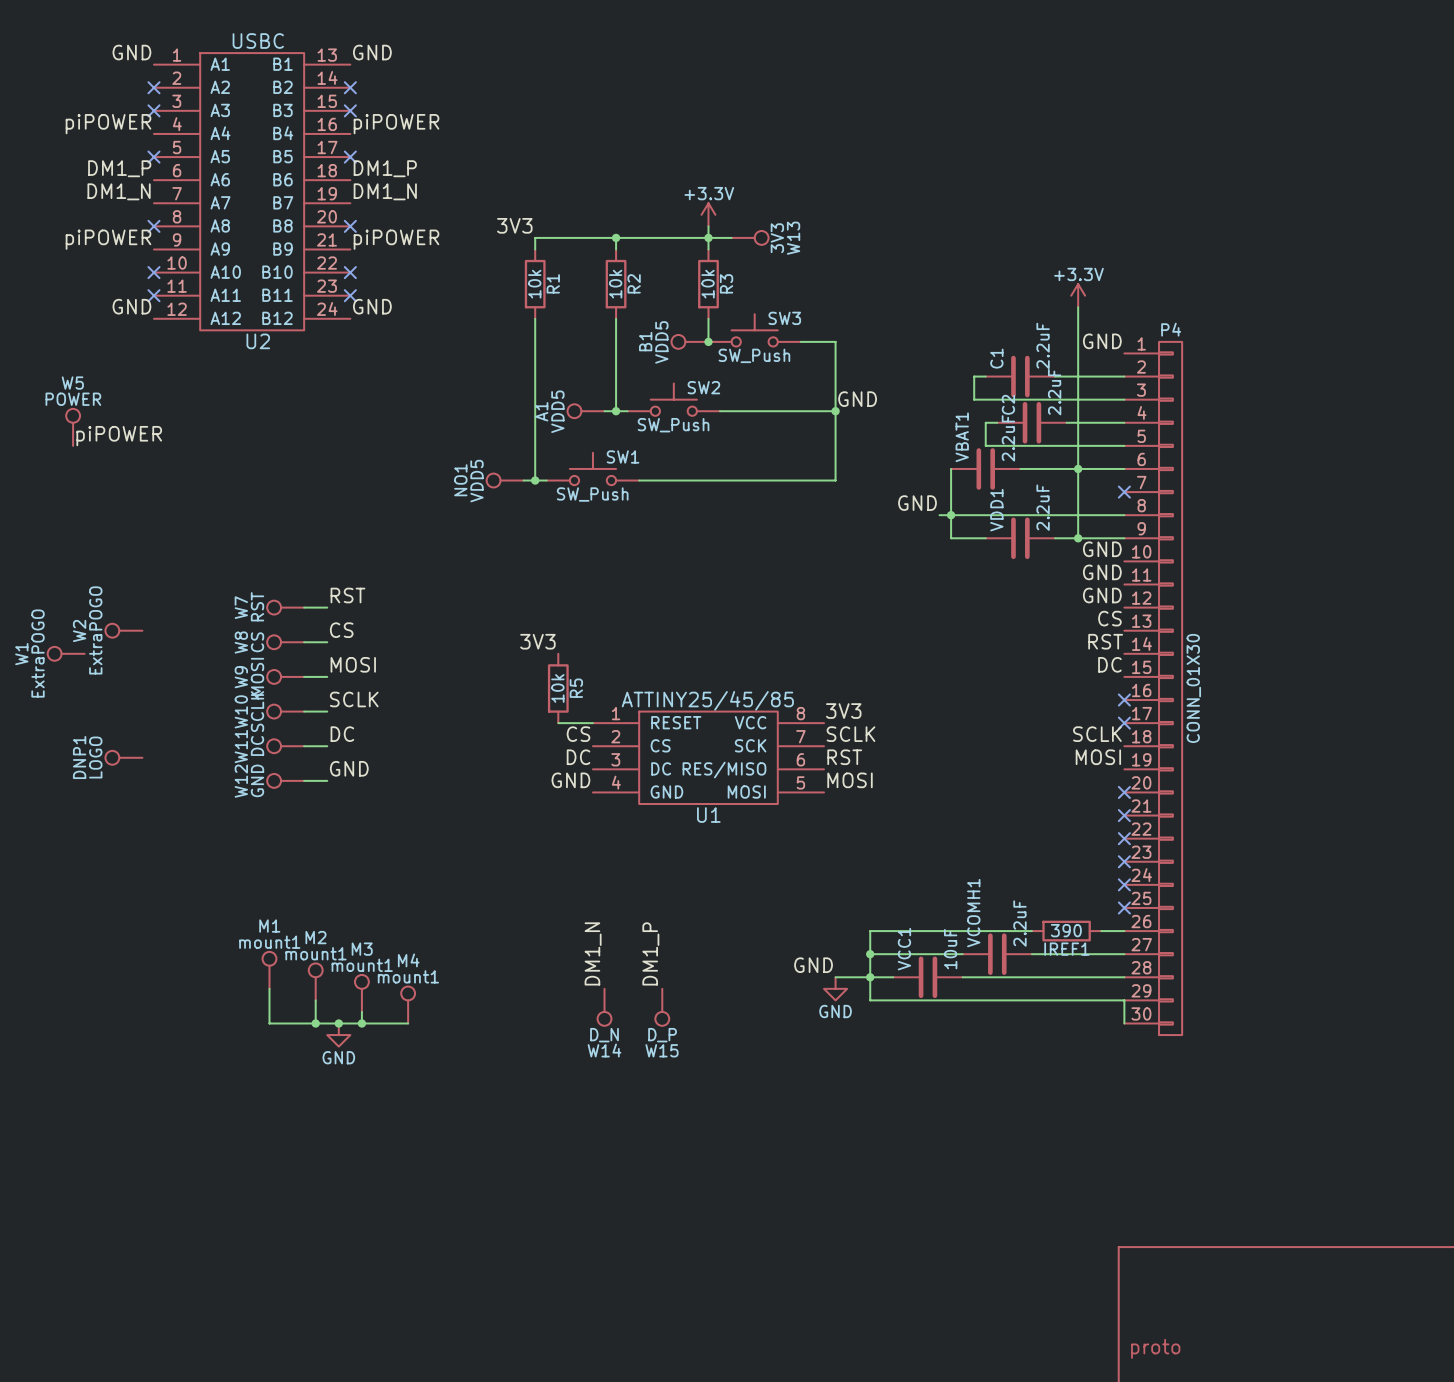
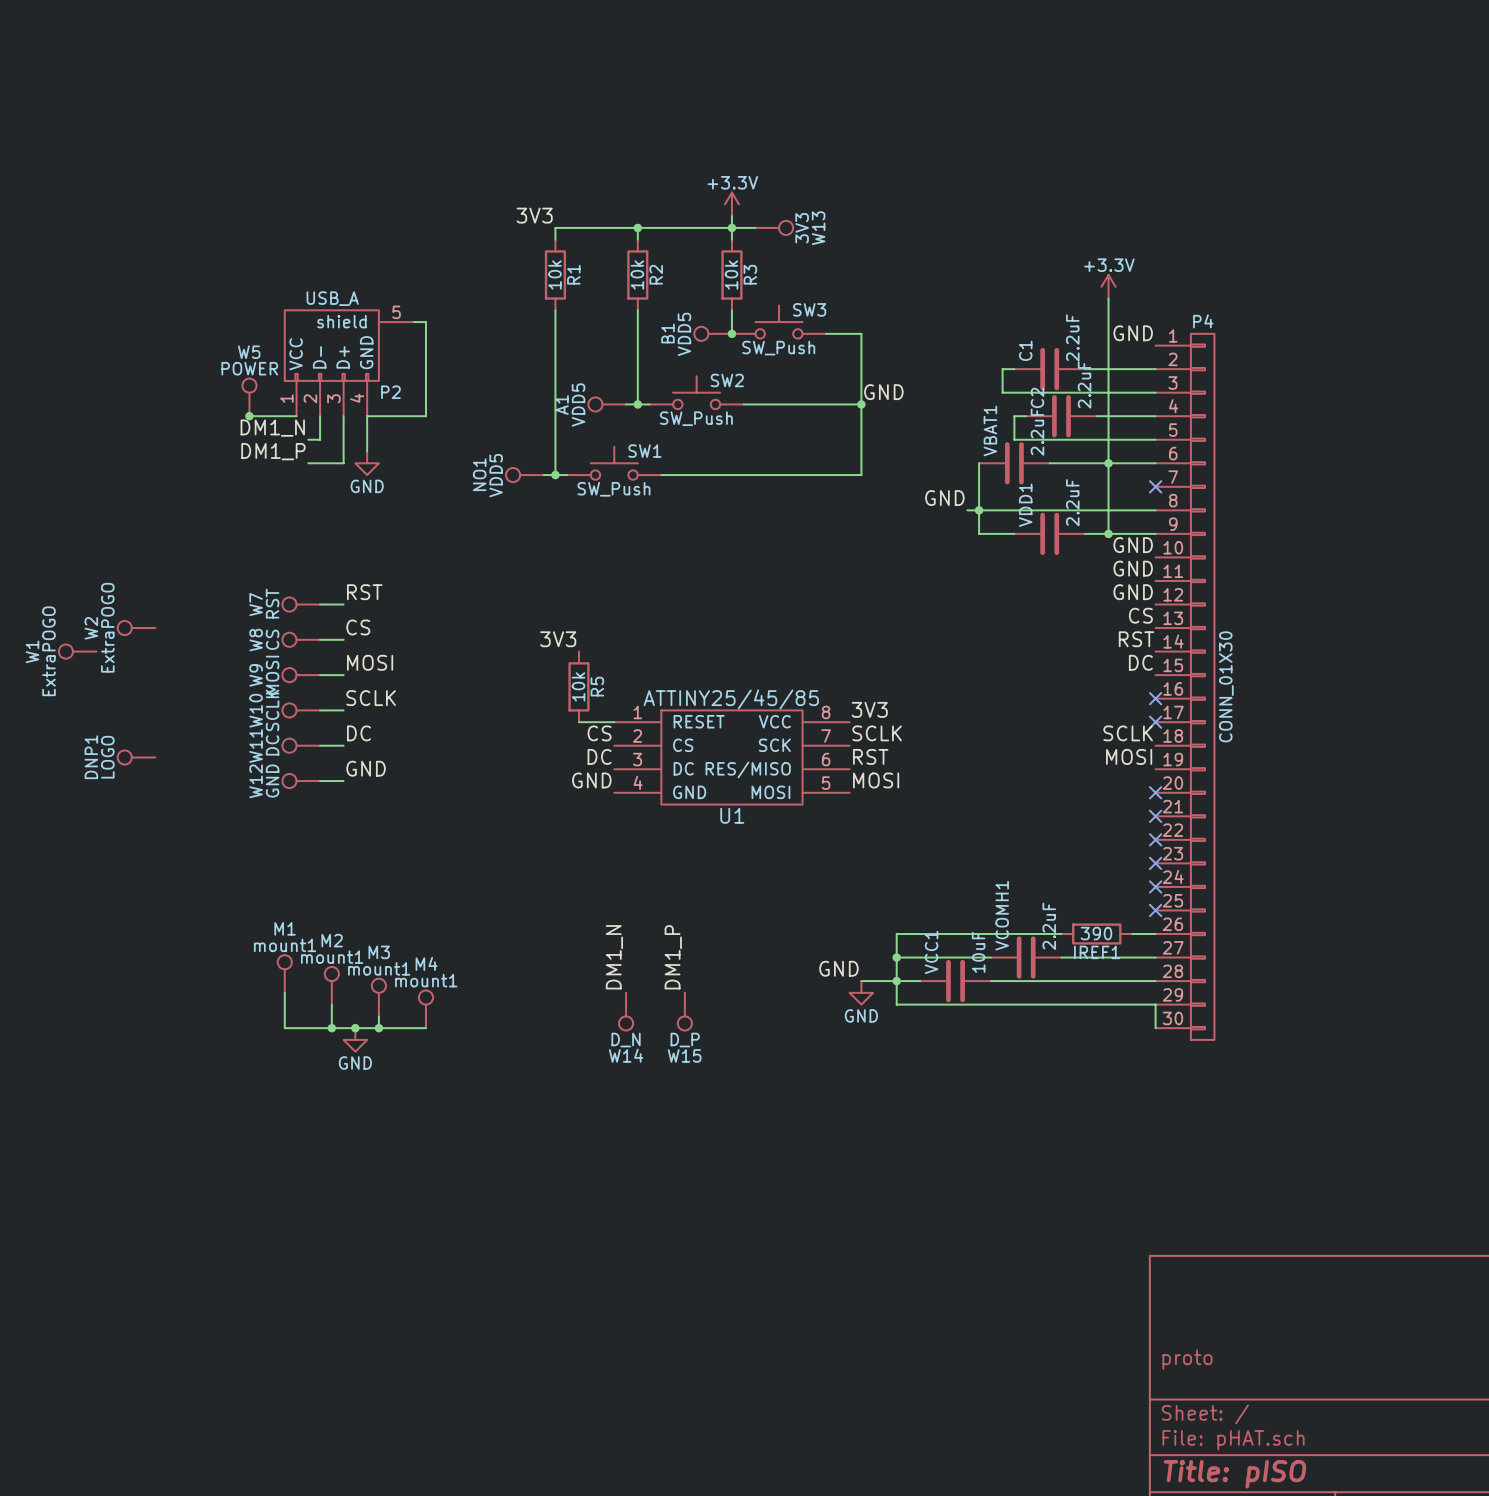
label: GND (131, 52) -> none
label: GND (372, 52) -> none
no-connect mark: (153, 87) -> none
no-connect mark: (350, 87) -> none
no-connect mark: (153, 110) -> none
no-connect mark: (350, 110) -> none
label: piPOWER (108, 124) -> none
label: piPOWER (396, 124) -> none
no-connect mark: (153, 157) -> none
no-connect mark: (350, 157) -> none
label: DM1_P (119, 168) -> none
label: DM1_P (385, 168) -> none
label: DM1_N (119, 191) -> none
U2: USBC (252, 191) -> none
label: DM1_N (385, 191) -> none
no-connect mark: (153, 226) -> none
no-connect mark: (350, 226) -> none
label: piPOWER (108, 239) -> none
label: piPOWER (396, 239) -> none
no-connect mark: (153, 272) -> none
no-connect mark: (350, 272) -> none
no-connect mark: (153, 295) -> none
no-connect mark: (350, 295) -> none
label: GND (131, 306) -> none
label: GND (372, 306) -> none
wire: none -> (414, 322) (425, 322) (425, 416) (367, 416) (367, 451)
P2: none -> USB_A (349, 363)
wire: none -> (249, 416) (296, 416)
junction: none -> (249, 416)
wire: none -> (320, 416) (320, 439) (308, 439)
wire: none -> (343, 416) (343, 463) (308, 463)
W5 position: (73, 427) -> (249, 397)
label: none -> DM1_N (272, 428)
label: piPOWER (119, 436) -> none
label: none -> DM1_P (273, 451)
power symbol: none -> GND (367, 463)

